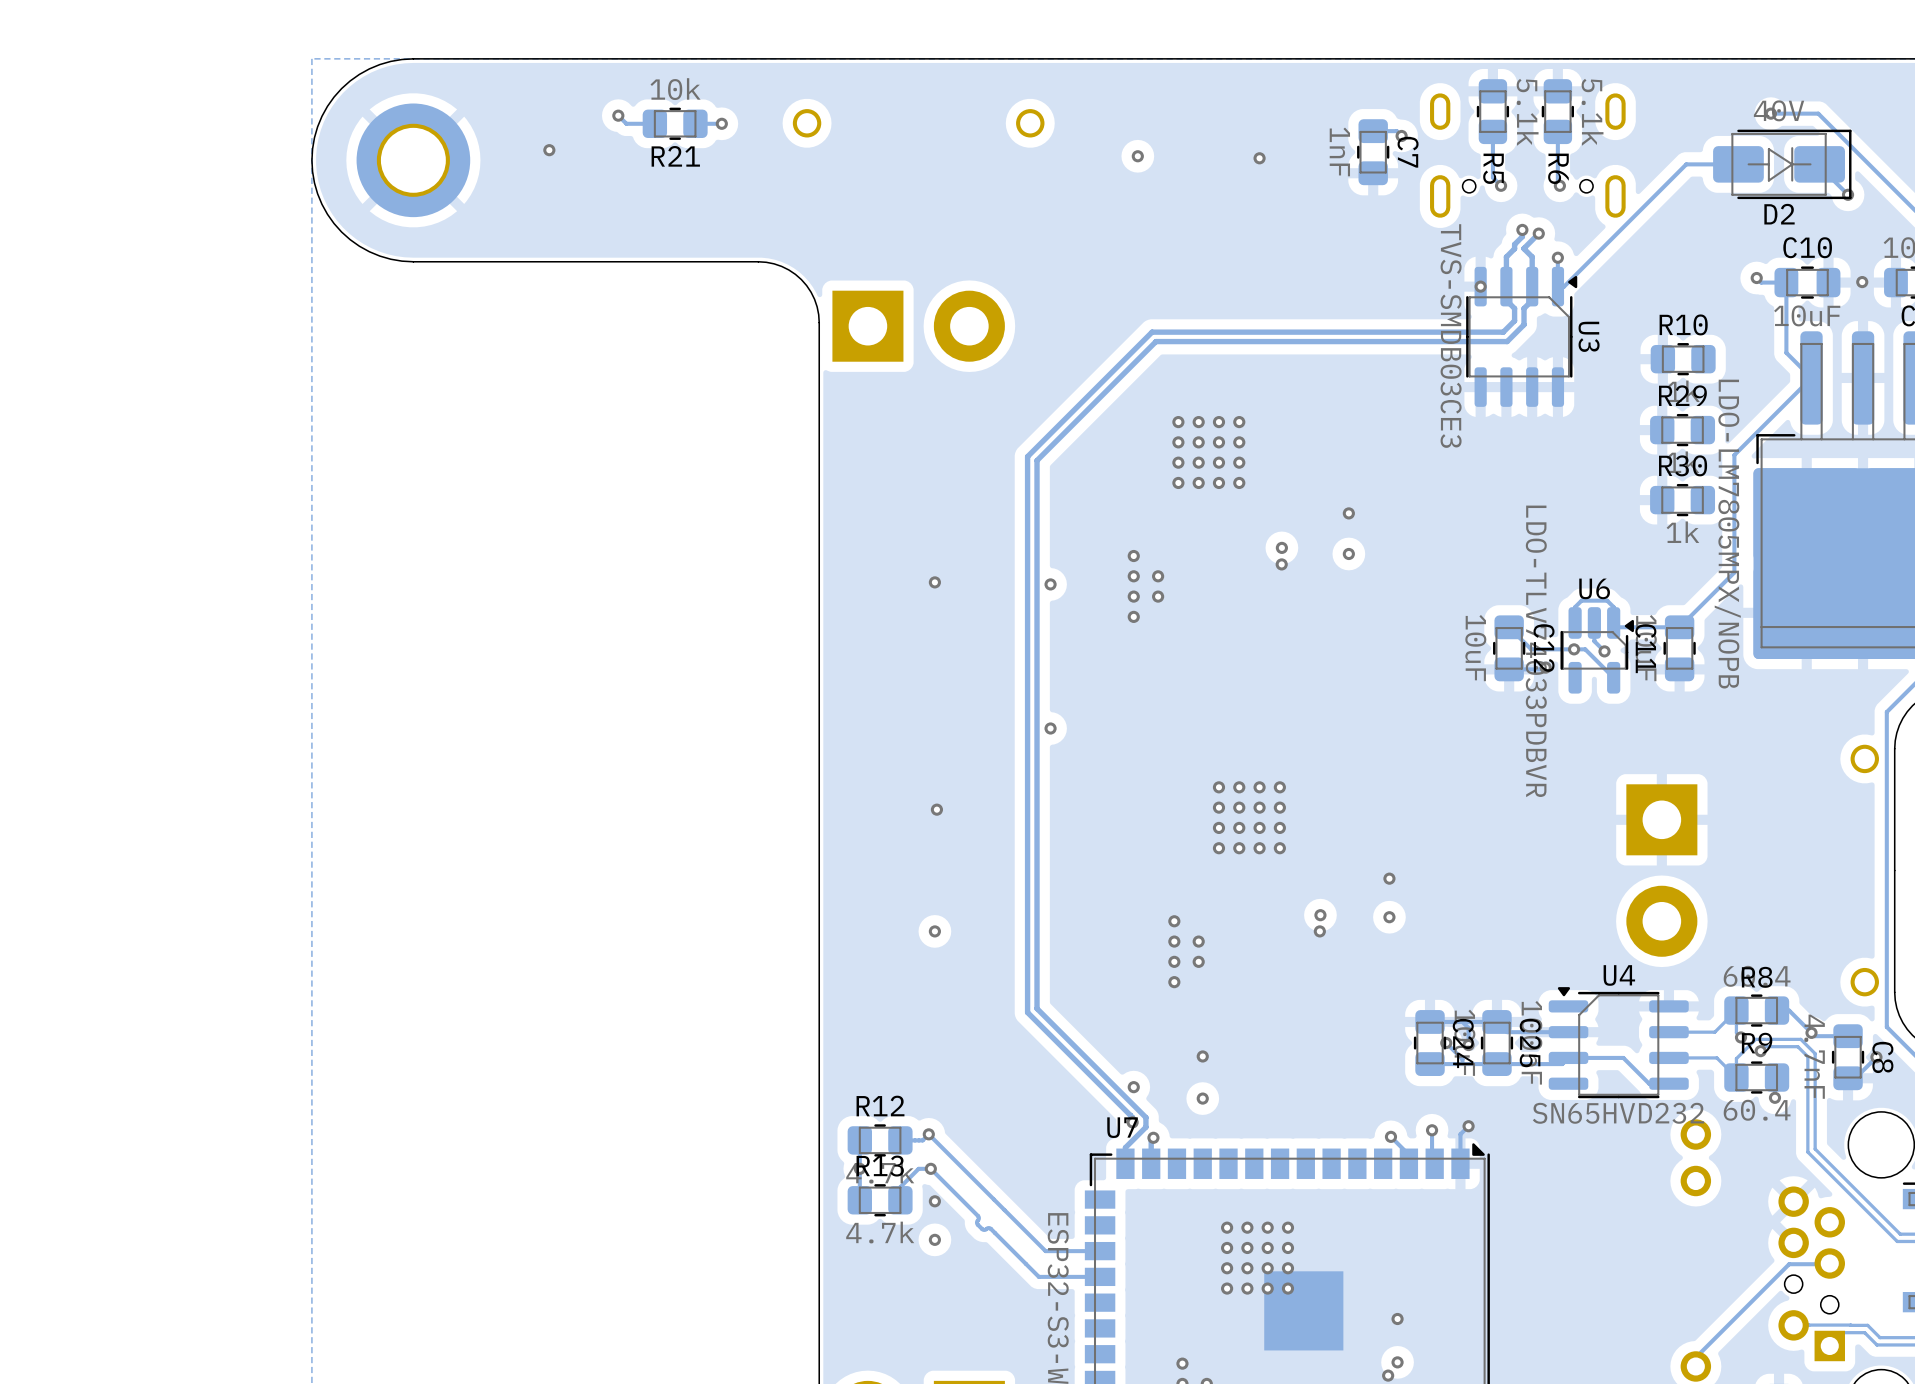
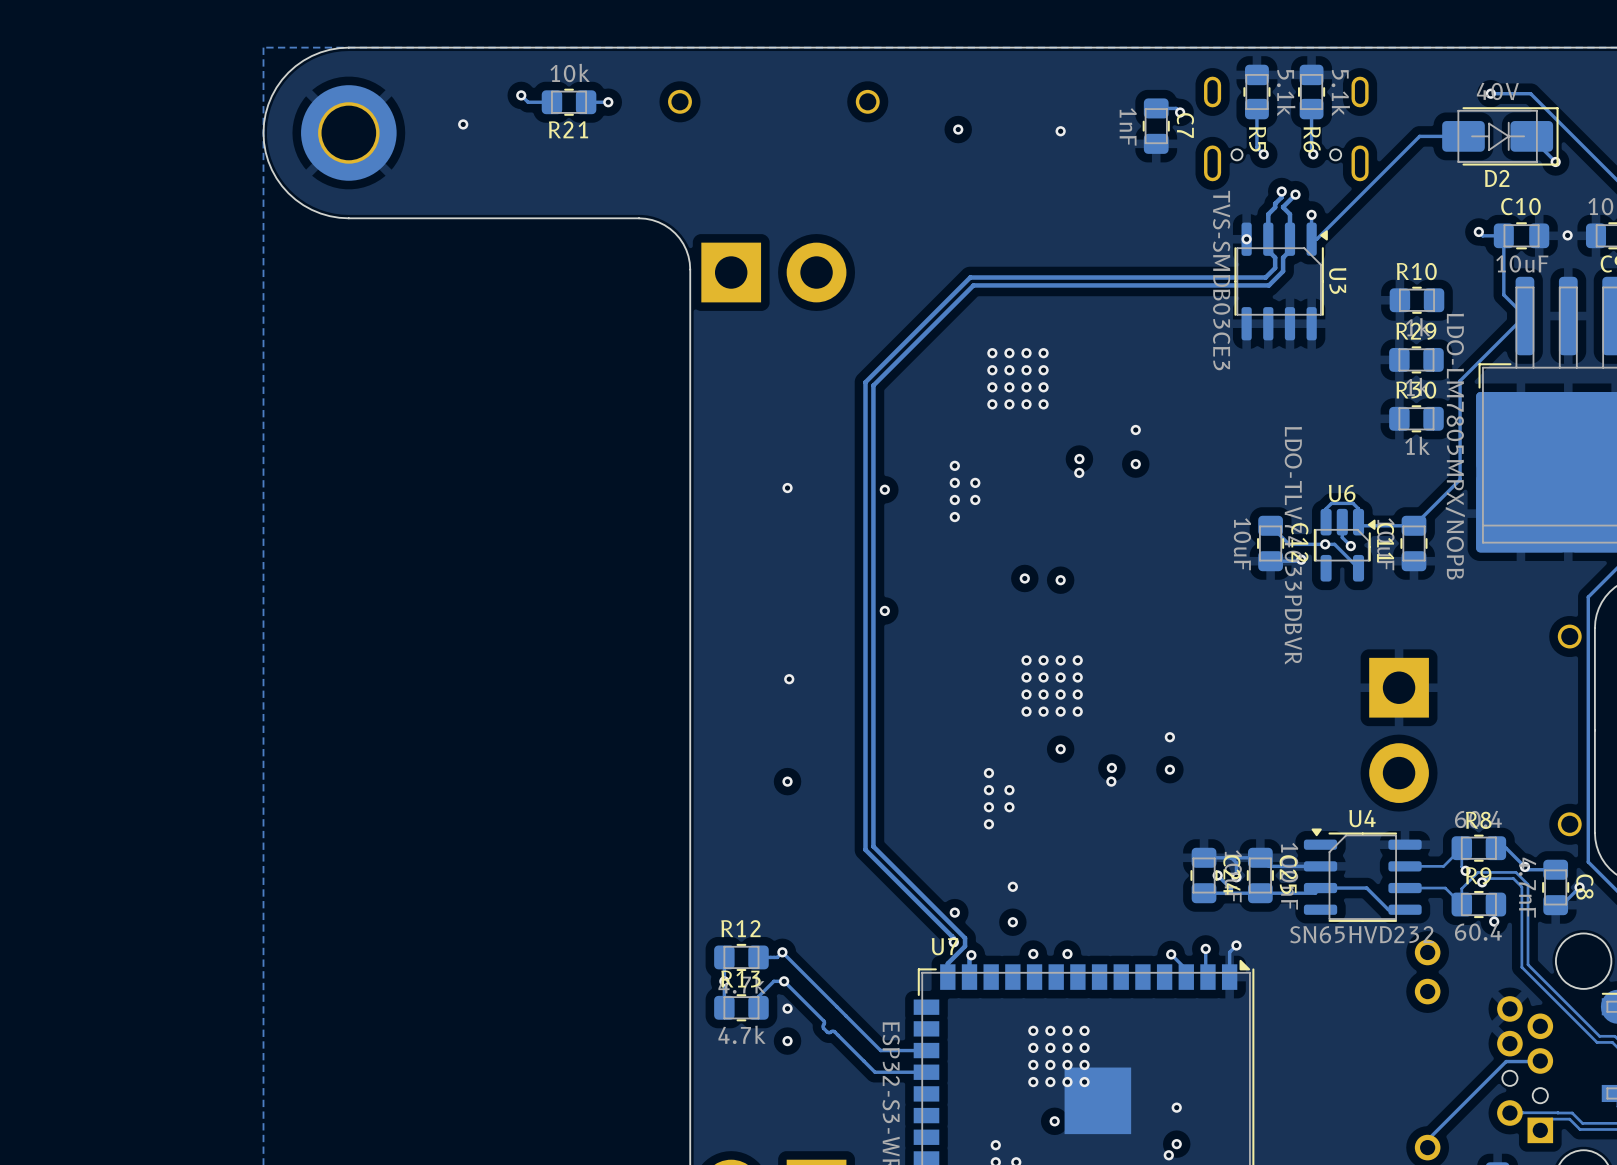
via: none -> (1024, 578)
via: none -> (1060, 580)
via: none -> (1060, 749)
via: none -> (1033, 954)
via: none -> (1067, 954)
via: none -> (1054, 1121)

